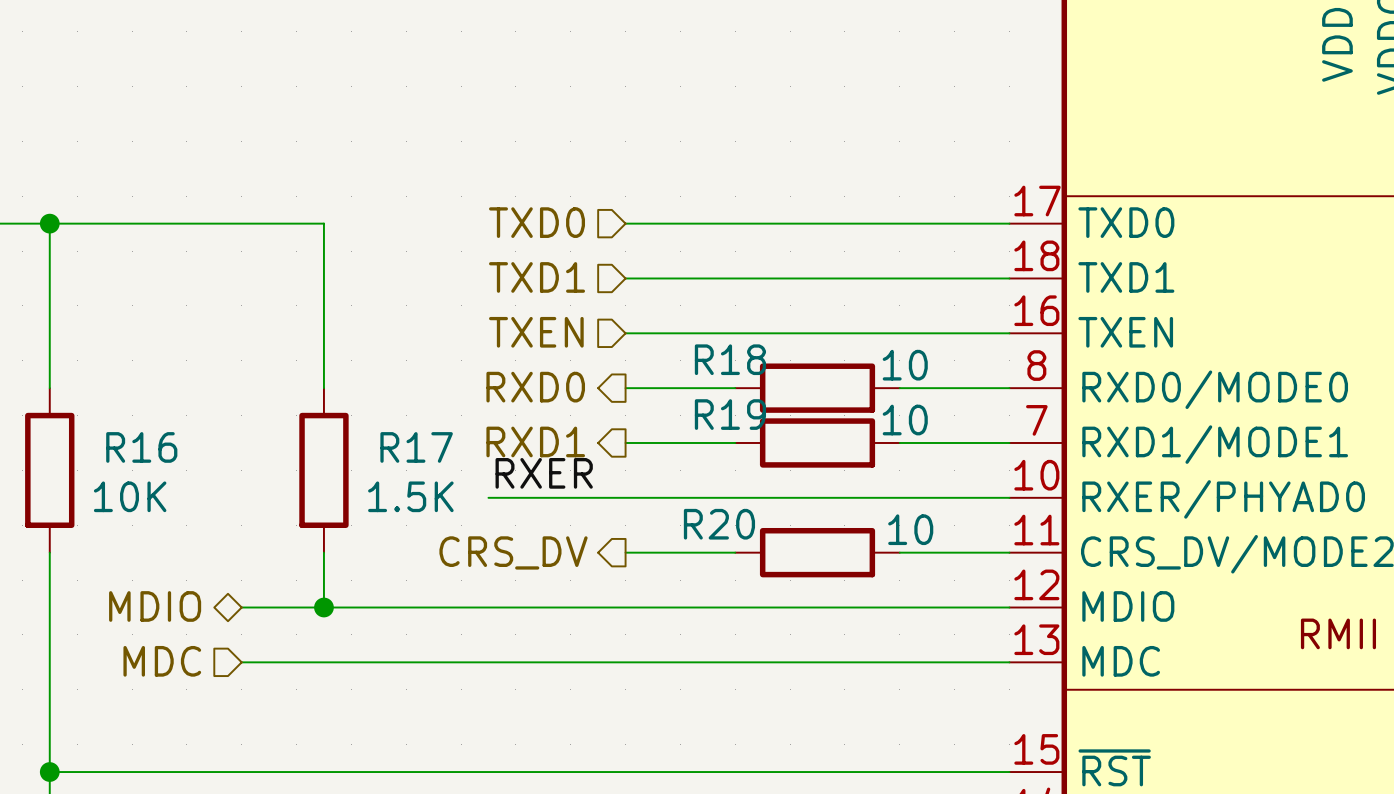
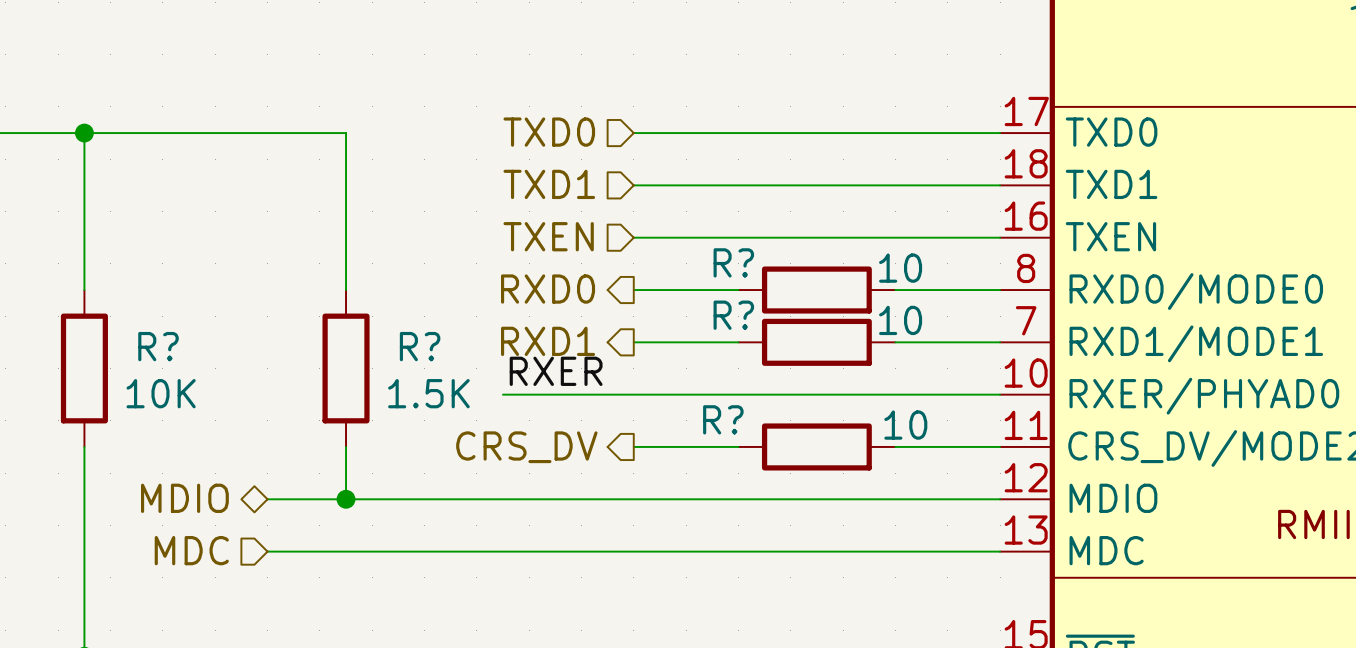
R18 name: R18 (730, 359) -> R? (733, 262)
R19 name: R19 (730, 414) -> R? (733, 315)
R16 name: R16 (141, 447) -> R? (158, 346)
R17 name: R17 (416, 447) -> R? (420, 346)
R20 name: R20 (719, 524) -> R? (723, 419)

